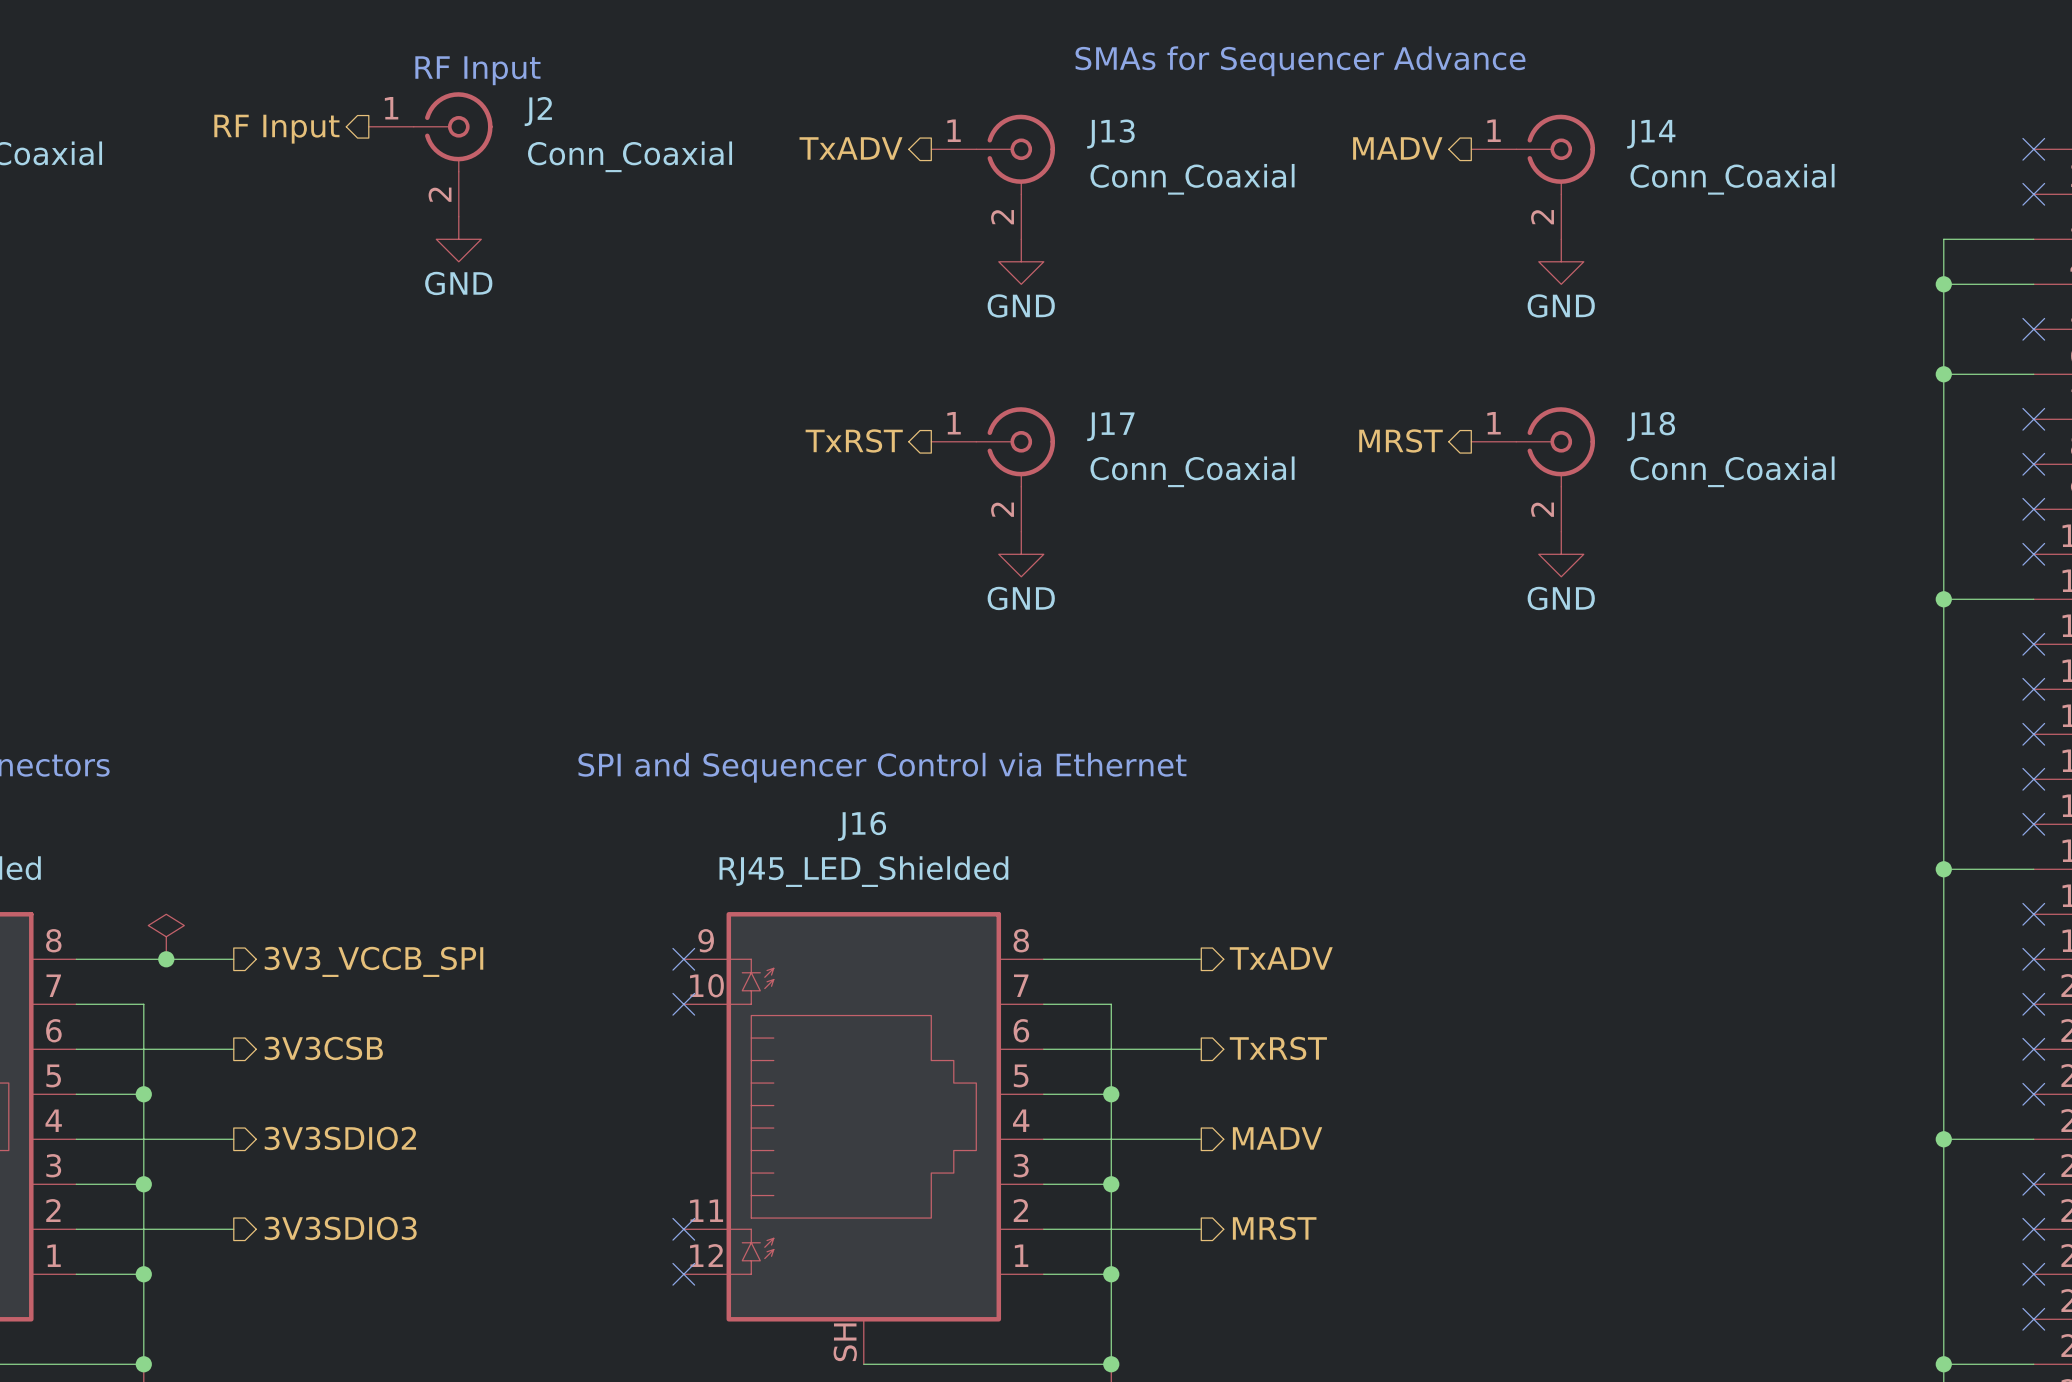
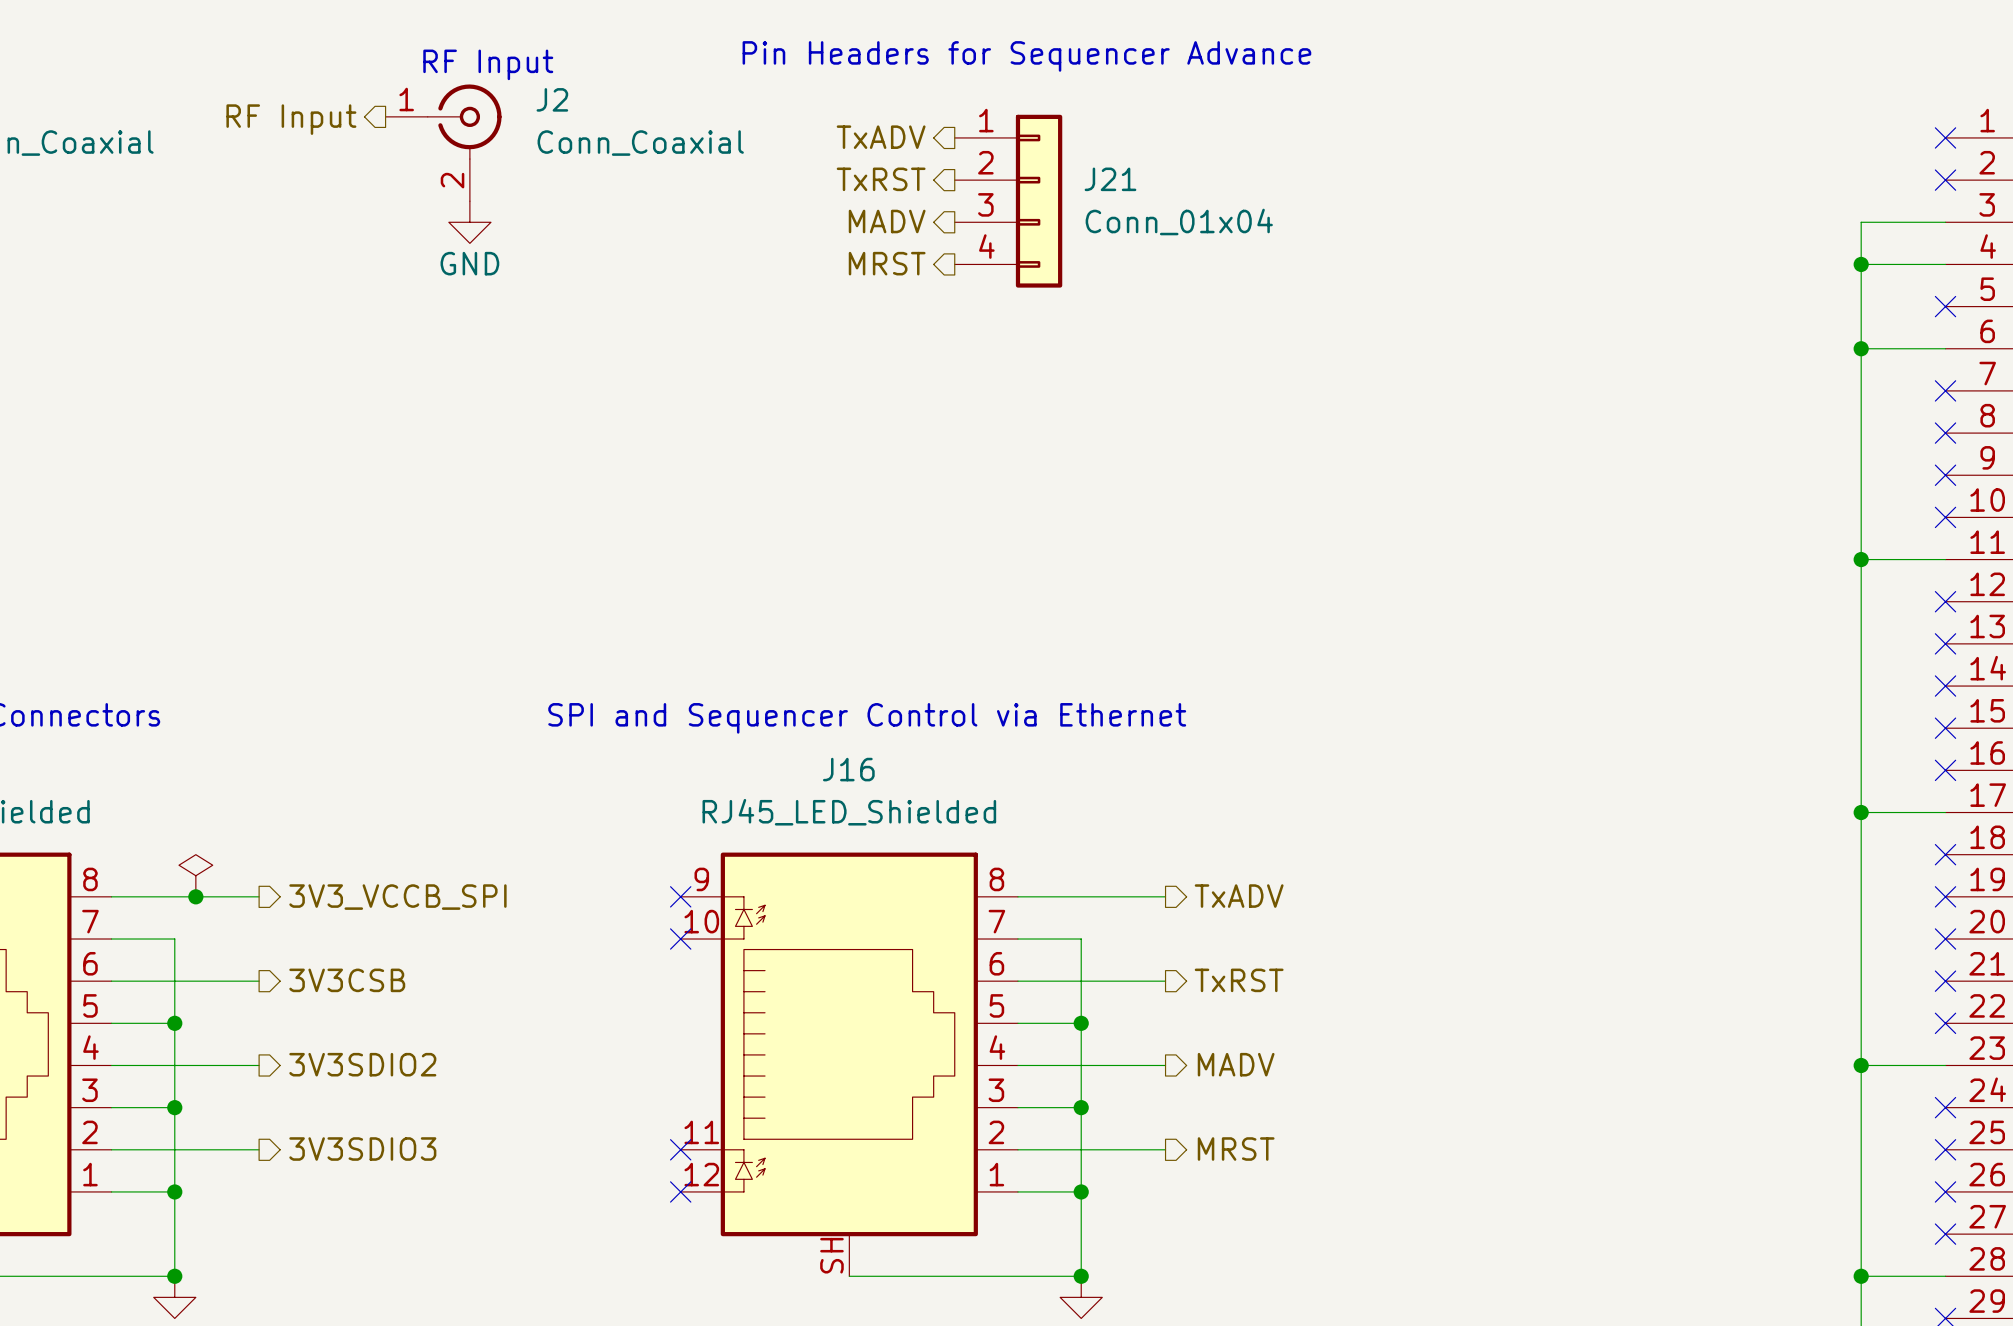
text: SMAs for Sequencer Advance (1300, 61) -> Pin Headers for Sequencer Advance (1026, 56)
hierarchical label position: TxADV (850, 148) -> TxADV (881, 137)
hierarchical label: MADV (1397, 148) -> none
J13: Conn_Coaxial (993, 176) -> none
J14: Conn_Coaxial (1533, 176) -> none
J21: none -> Conn_01x04 (1008, 201)
hierarchical label: none -> MADV (887, 221)
power symbol: GND (1021, 261) -> none
power symbol: GND (1561, 261) -> none
hierarchical label: none -> MRST (887, 263)
hierarchical label position: TxRST (854, 440) -> TxRST (881, 179)
hierarchical label: MRST (1401, 440) -> none
J17: Conn_Coaxial (993, 469) -> none
J18: Conn_Coaxial (1533, 469) -> none
power symbol: GND (1021, 554) -> none
power symbol: GND (1561, 554) -> none

